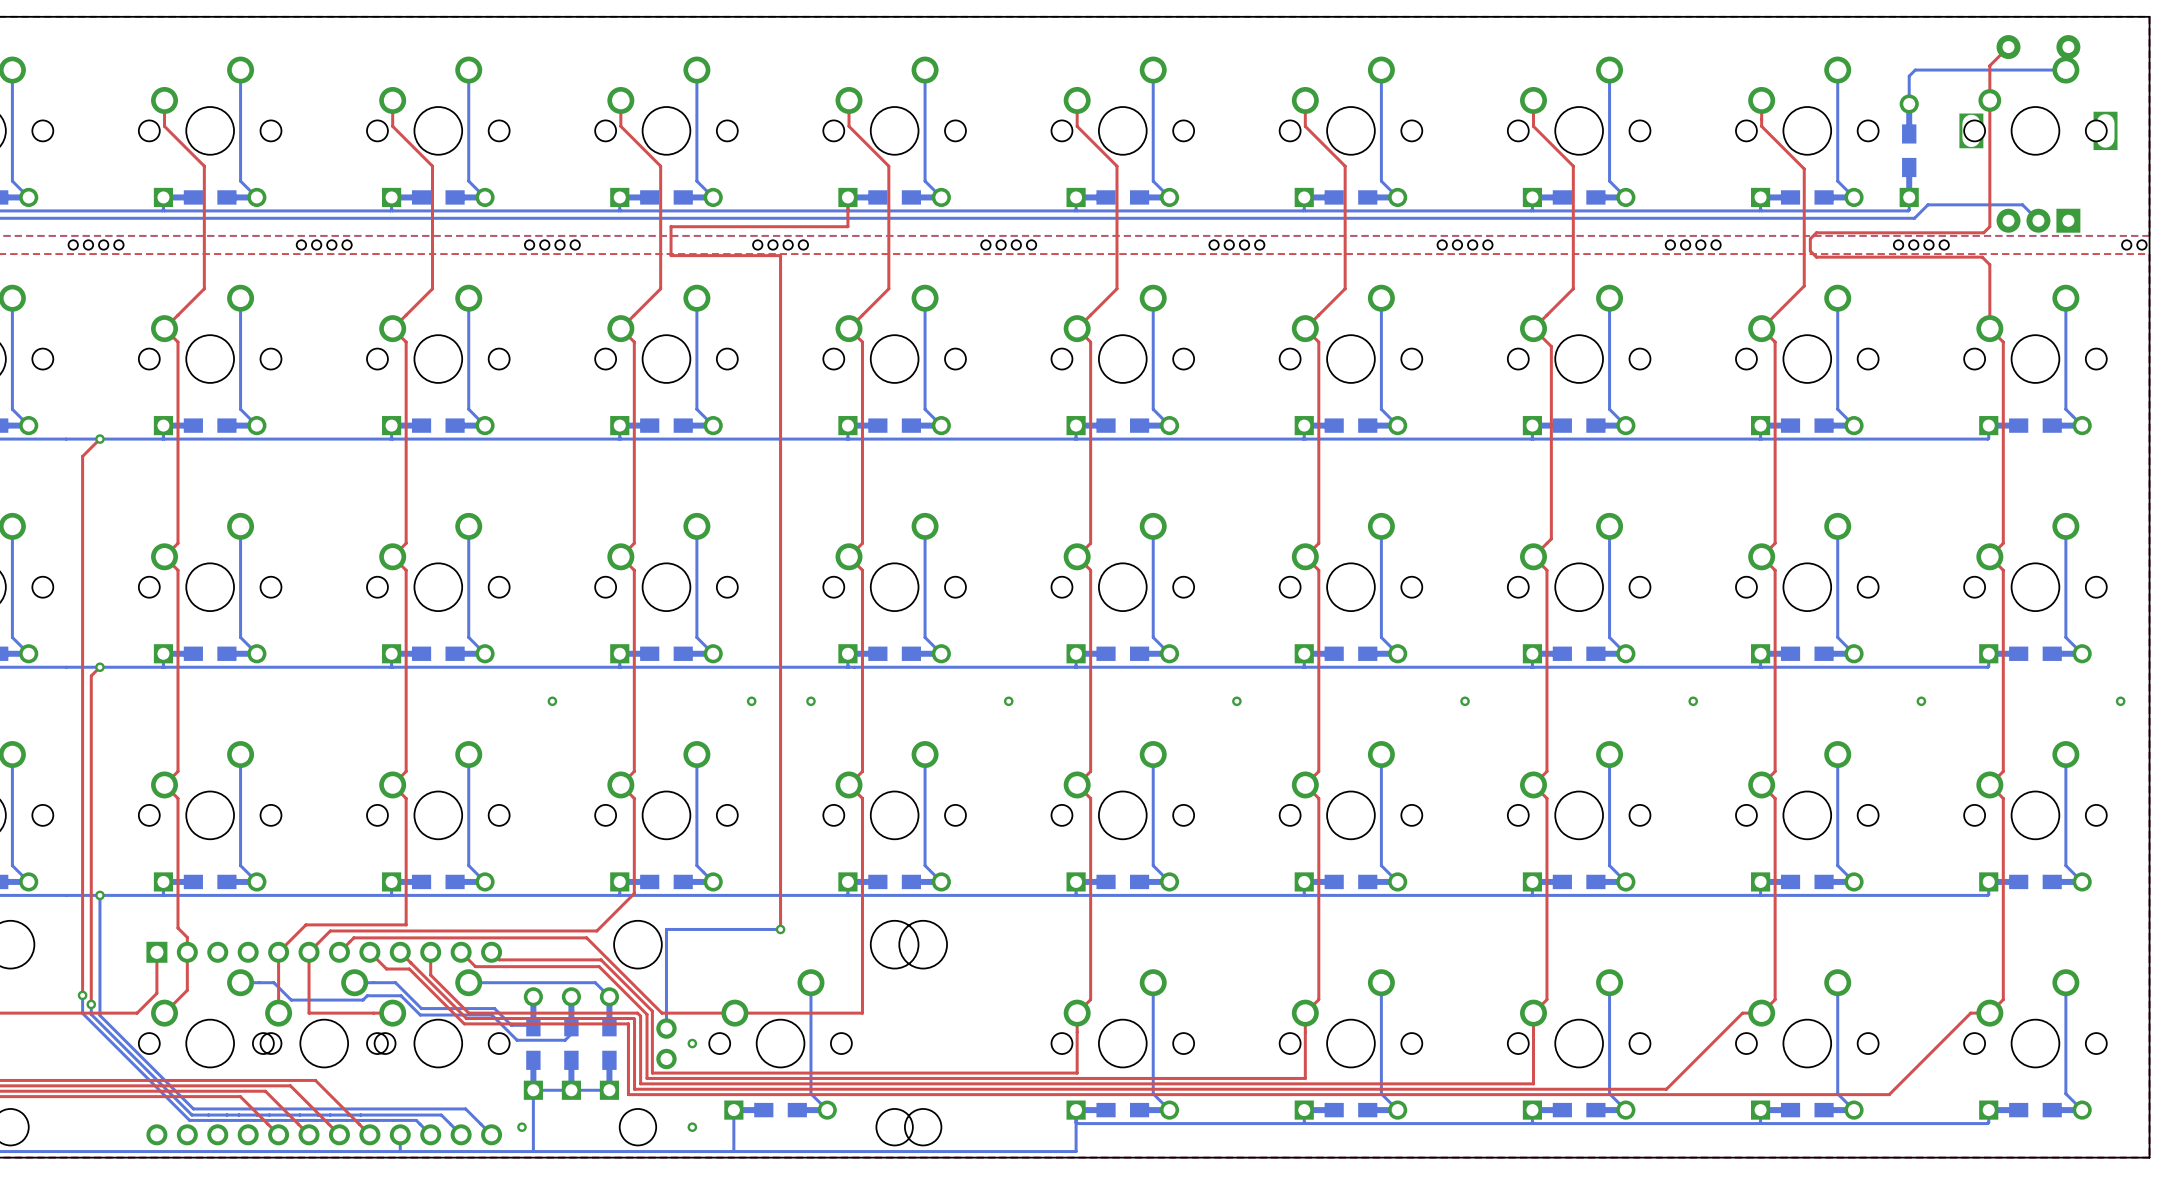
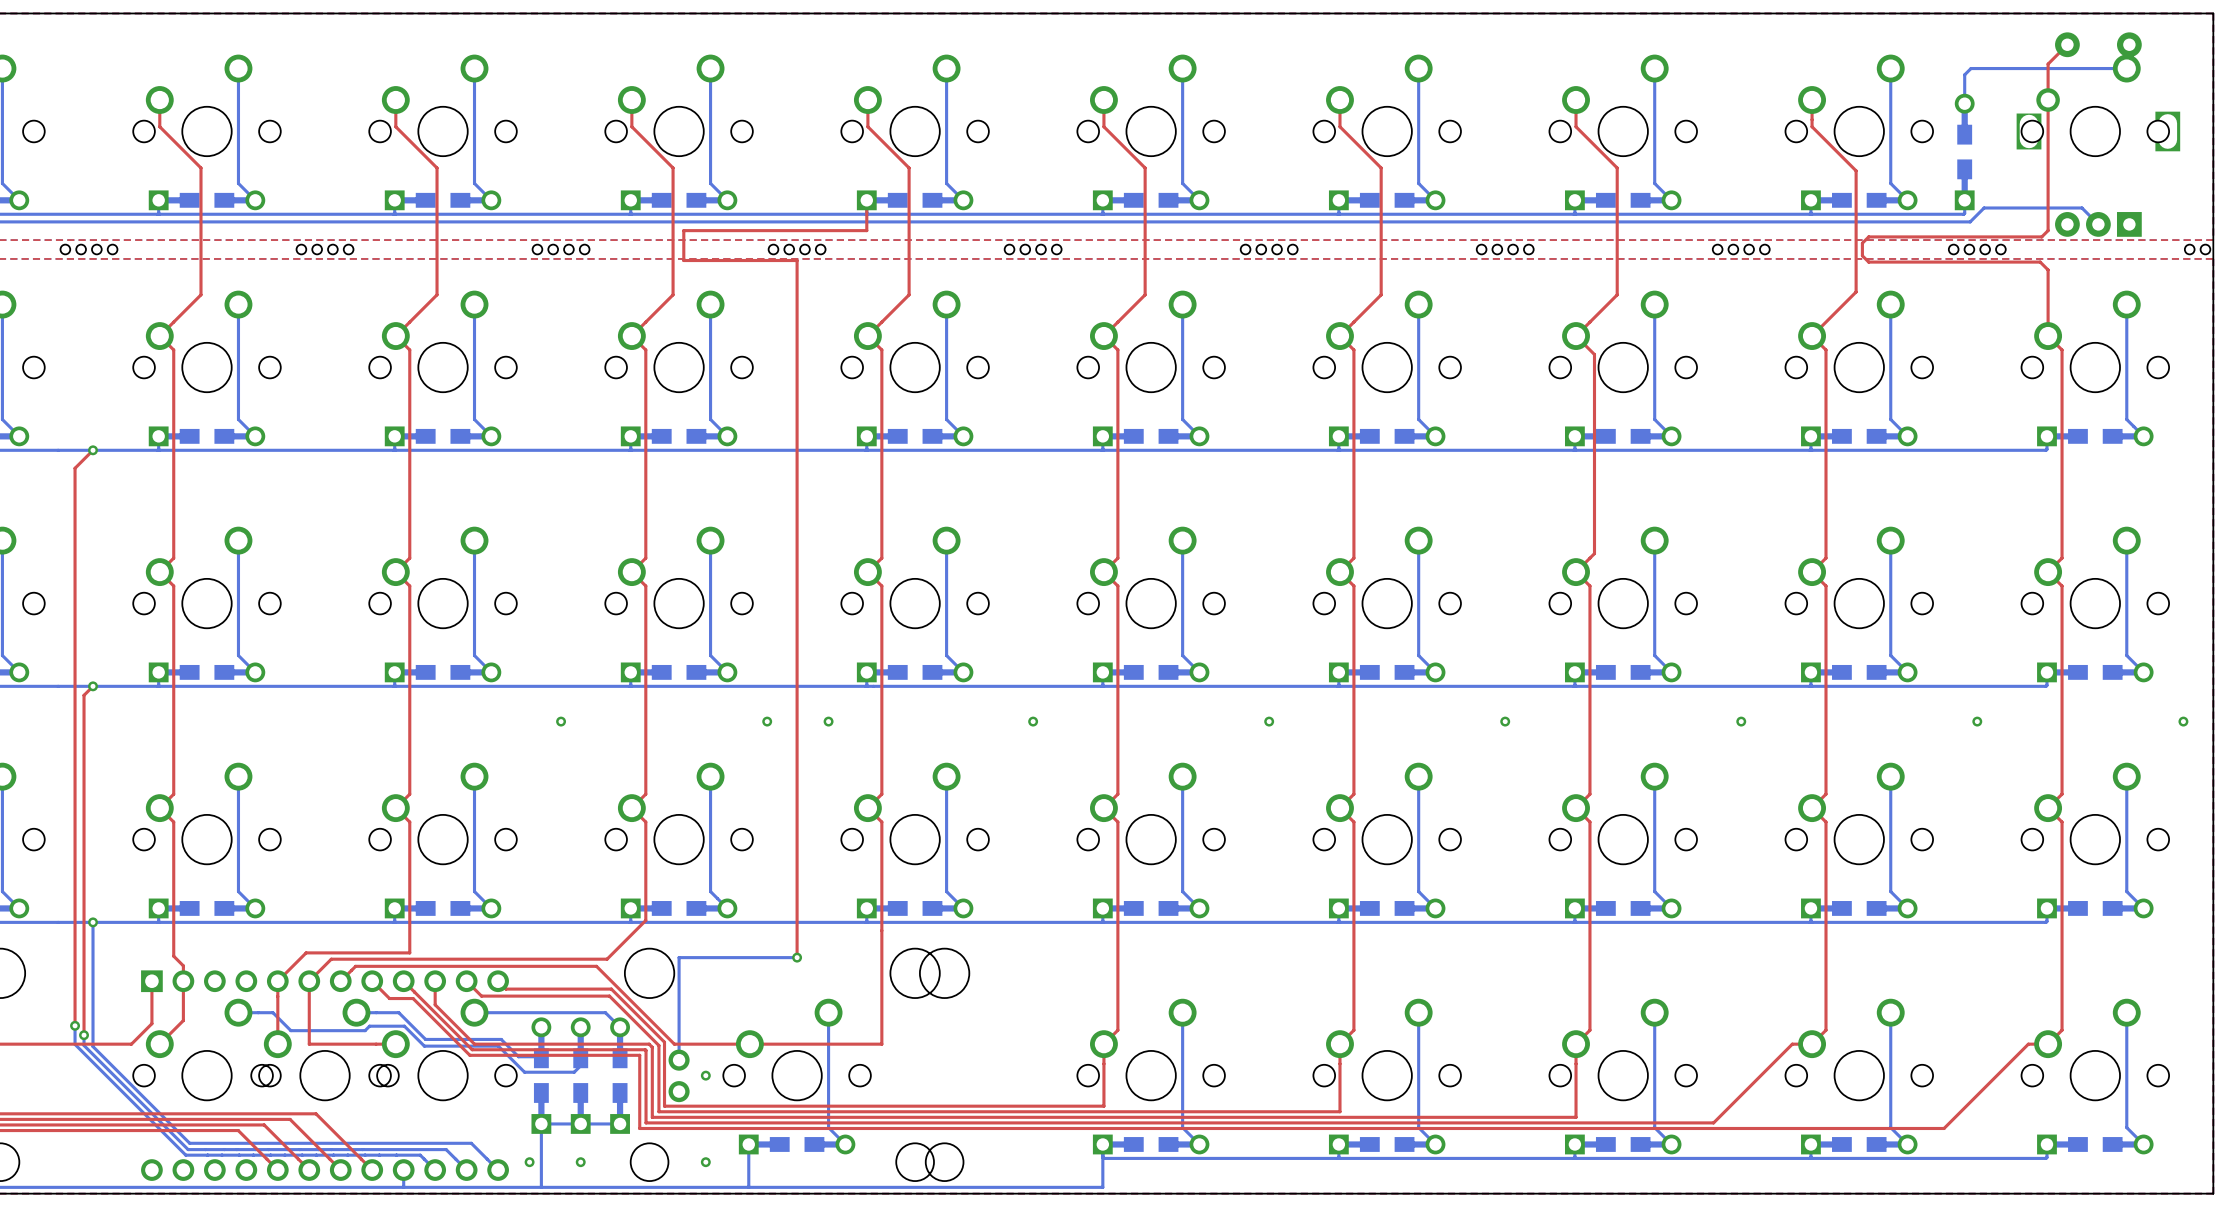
via: none -> (580, 1162)

